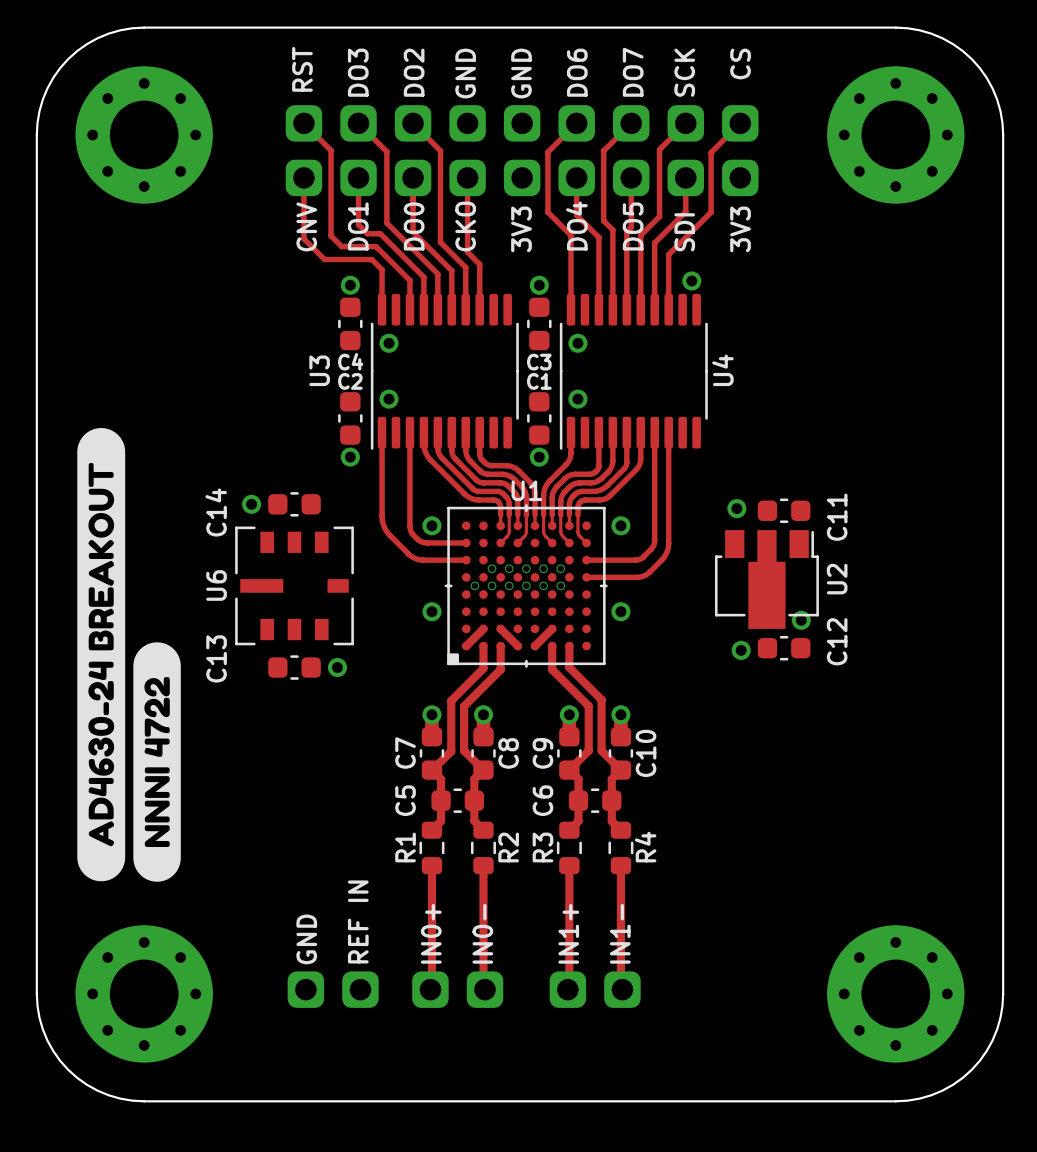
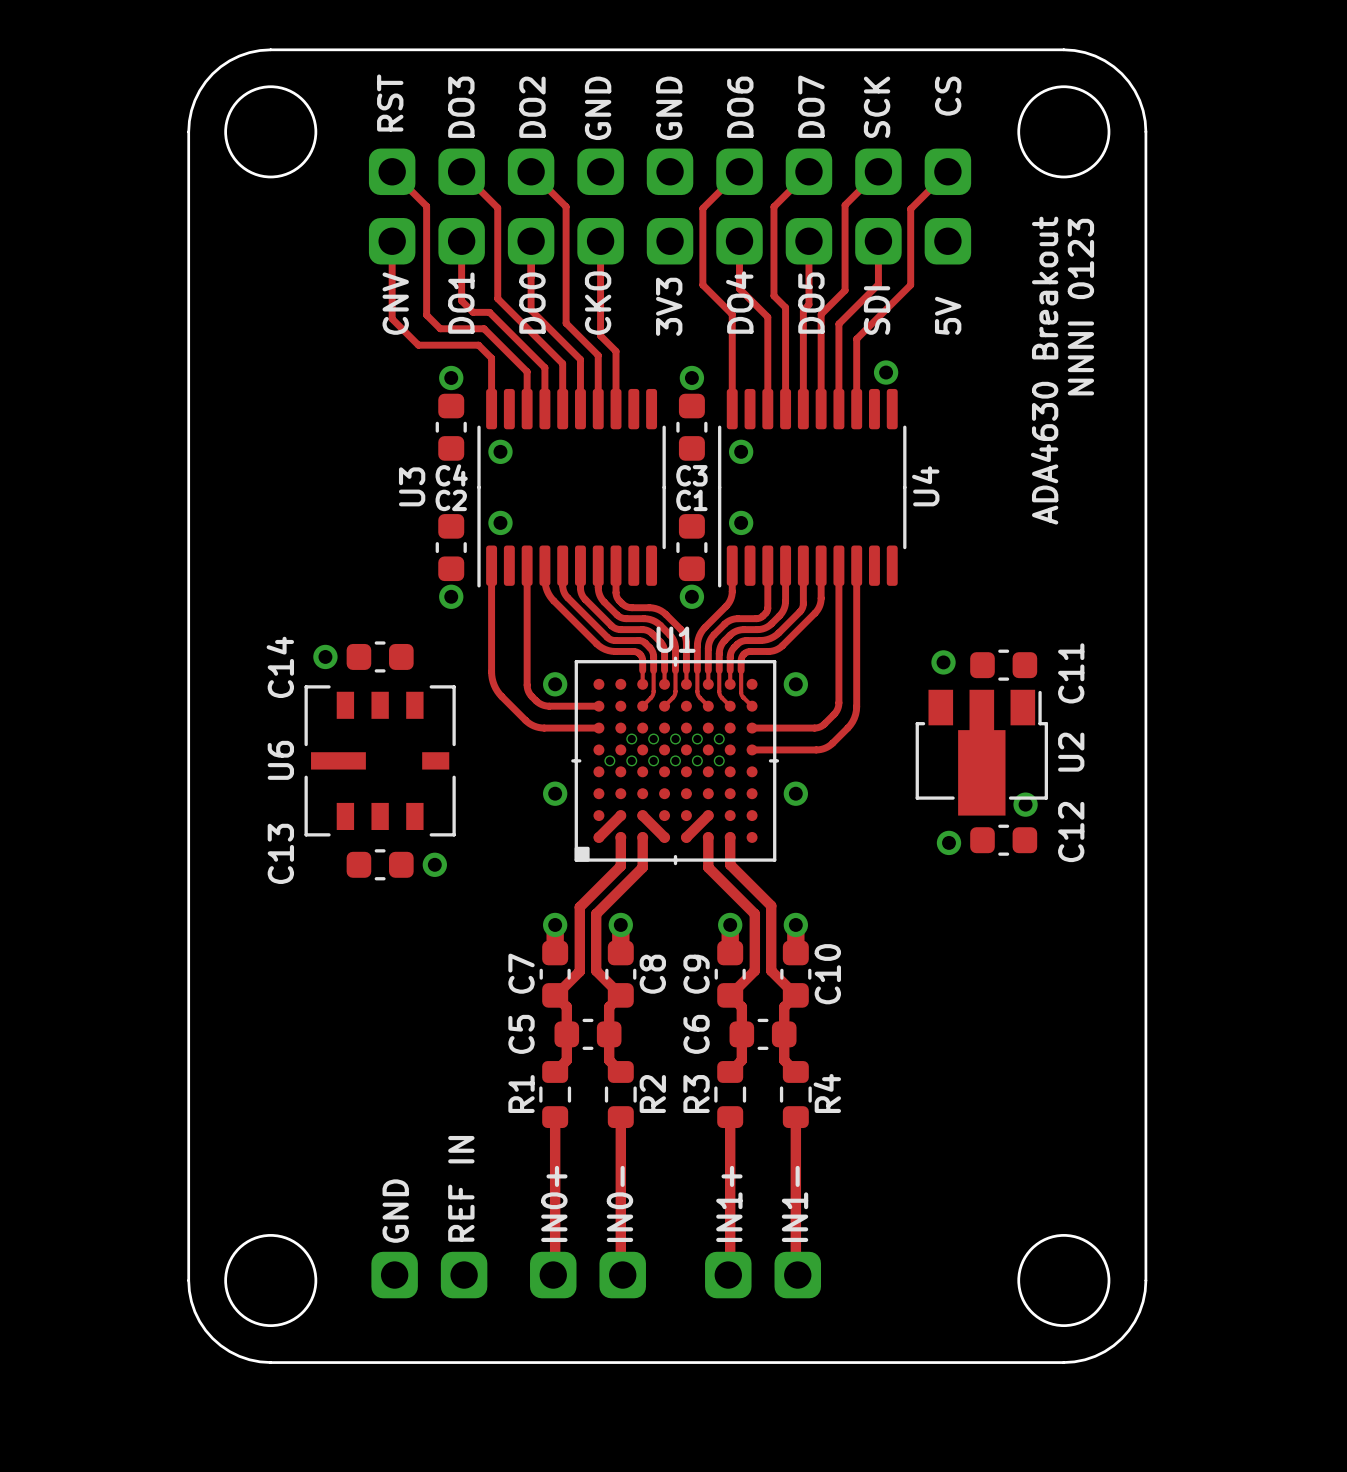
board edge: (208, 27) (132, 28) (108, 33) (87, 44) (68, 59) (53, 77) (42, 99) (37, 122) (37, 1005) (47, 1040) (68, 1069) (97, 1090) (132, 1100) (907, 1100) (931, 1095) (952, 1084) (971, 1069) (986, 1051) (1000, 1017) (1003, 993) (1002, 122) (997, 99) (986, 77) (971, 59) (952, 44) (931, 33) (907, 28) (831, 27) -> (270, 49) (239, 56) (212, 73) (194, 100) (188, 131) (189, 1291) (199, 1321) (212, 1338) (239, 1356) (270, 1362) (1063, 1362) (1085, 1359) (1104, 1351) (1121, 1338) (1134, 1321) (1143, 1301) (1145, 1280) (1145, 131) (1139, 100) (1121, 73) (1095, 56) (1063, 49)
round board edge: none -> [224, 85, 318, 179]
round board edge: none -> [1017, 85, 1111, 179]
part: (144, 134) -> none
part: (895, 134) -> none
text: 3V3 (740, 229) -> 5V (948, 315)
text: none -> NNNI 0123 (1080, 307)
text: none -> ADA4630 Breakout (1044, 370)
drawing: [77, 428, 181, 882] -> none
round board edge: none -> [224, 1234, 318, 1328]
round board edge: none -> [1017, 1234, 1111, 1328]
part: (144, 993) -> none
part: (895, 993) -> none

